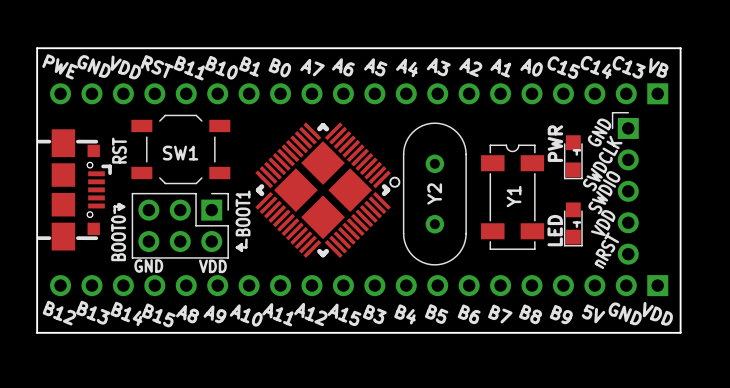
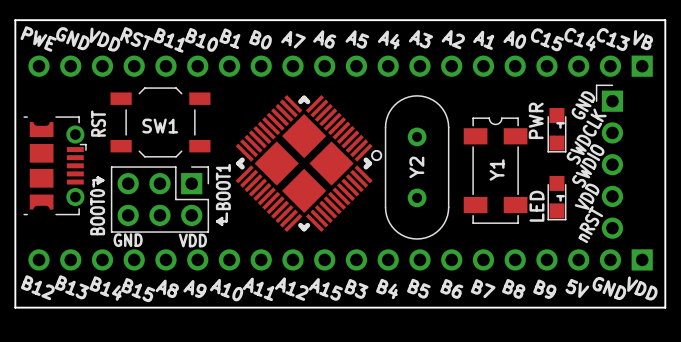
part footprint: [37, 129, 112, 251] -> [23, 116, 87, 216]
text: PWR (555, 143) -> none
PWR name: none -> PWR (536, 120)
text: LED (555, 230) -> none
LED name: none -> LED (536, 206)

